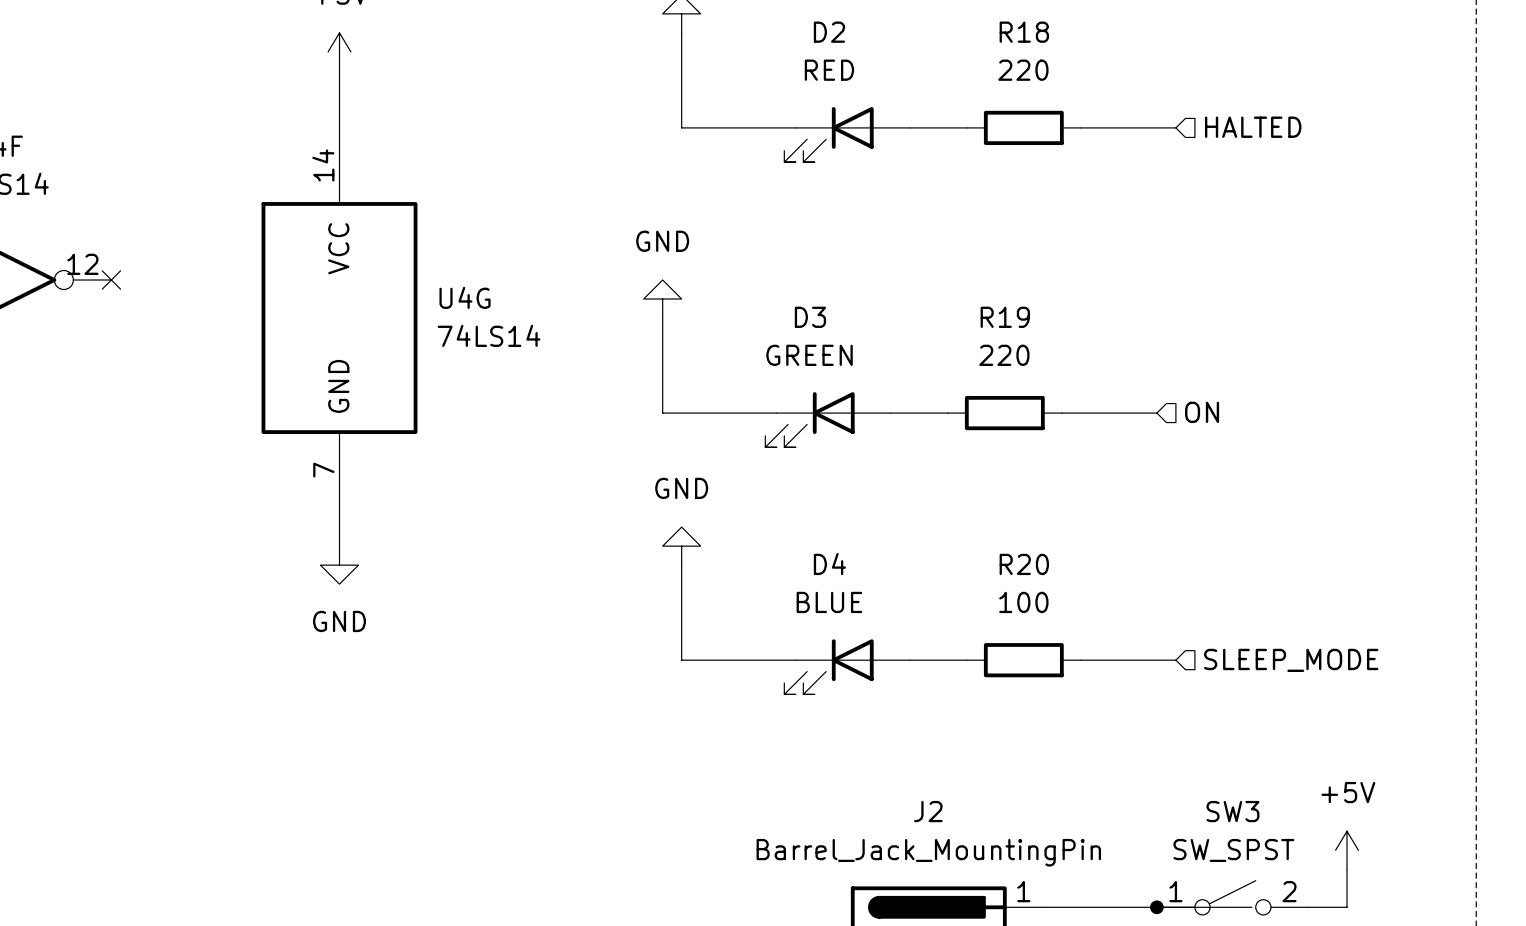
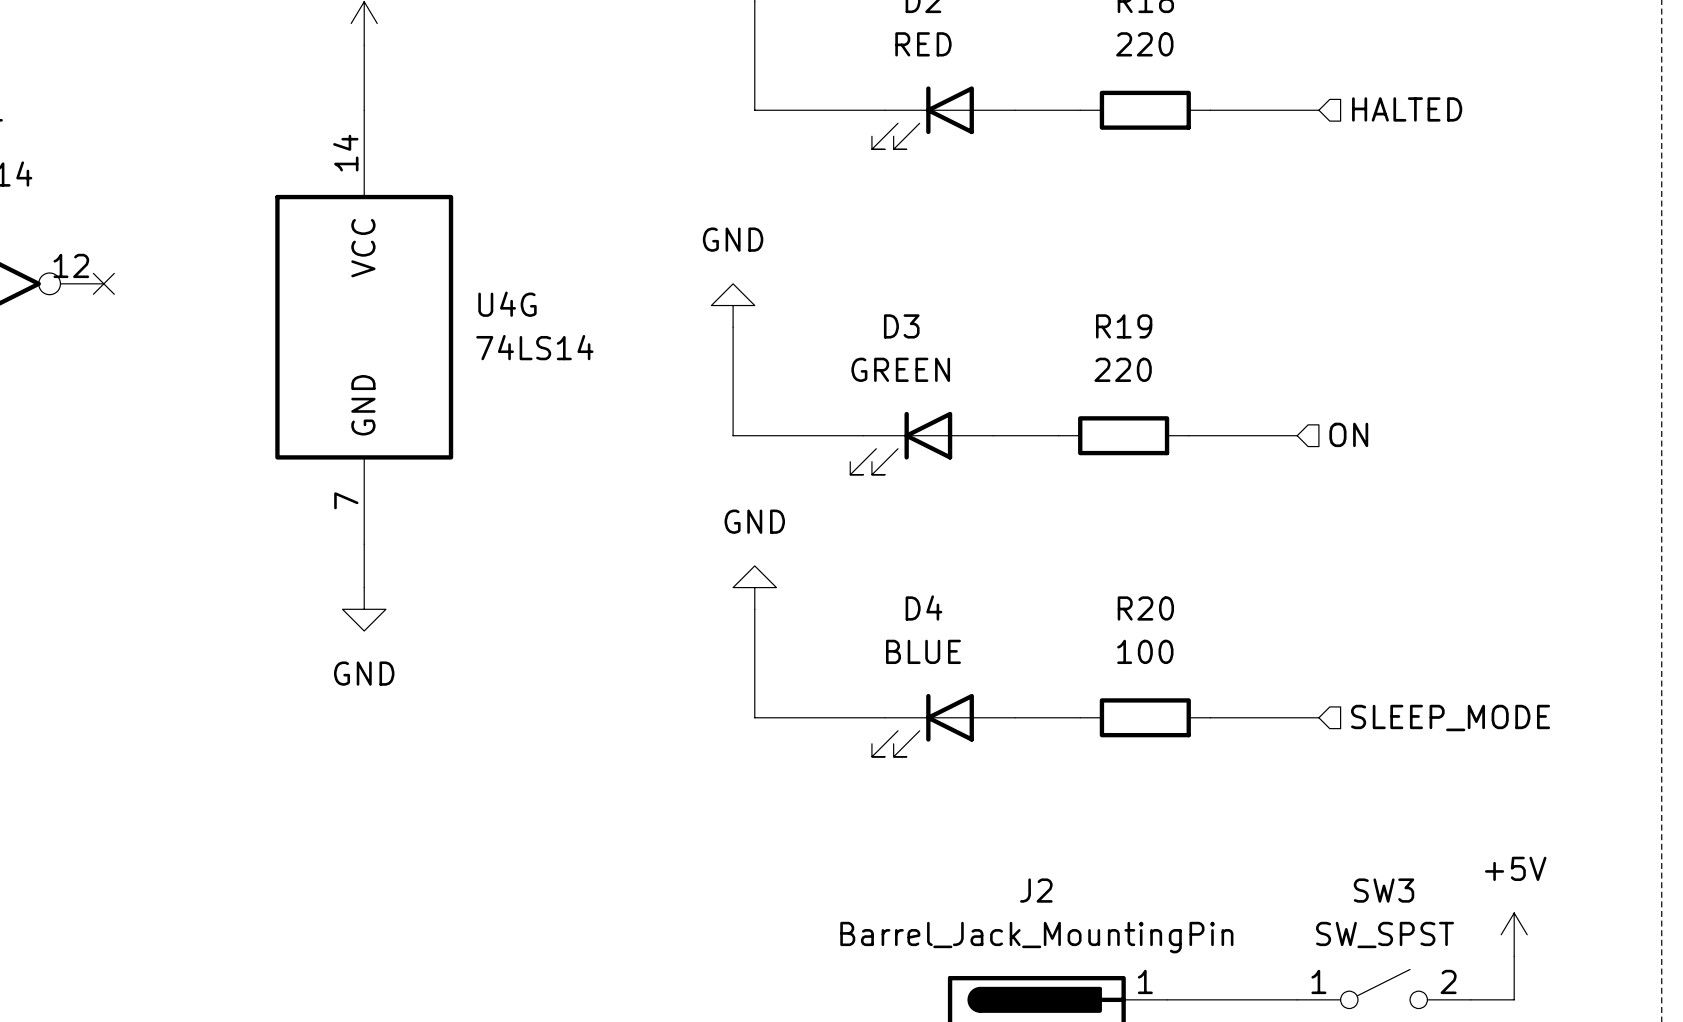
wire: (1156, 907) (1251, 907) -> none
junction: (1156, 907) -> none

